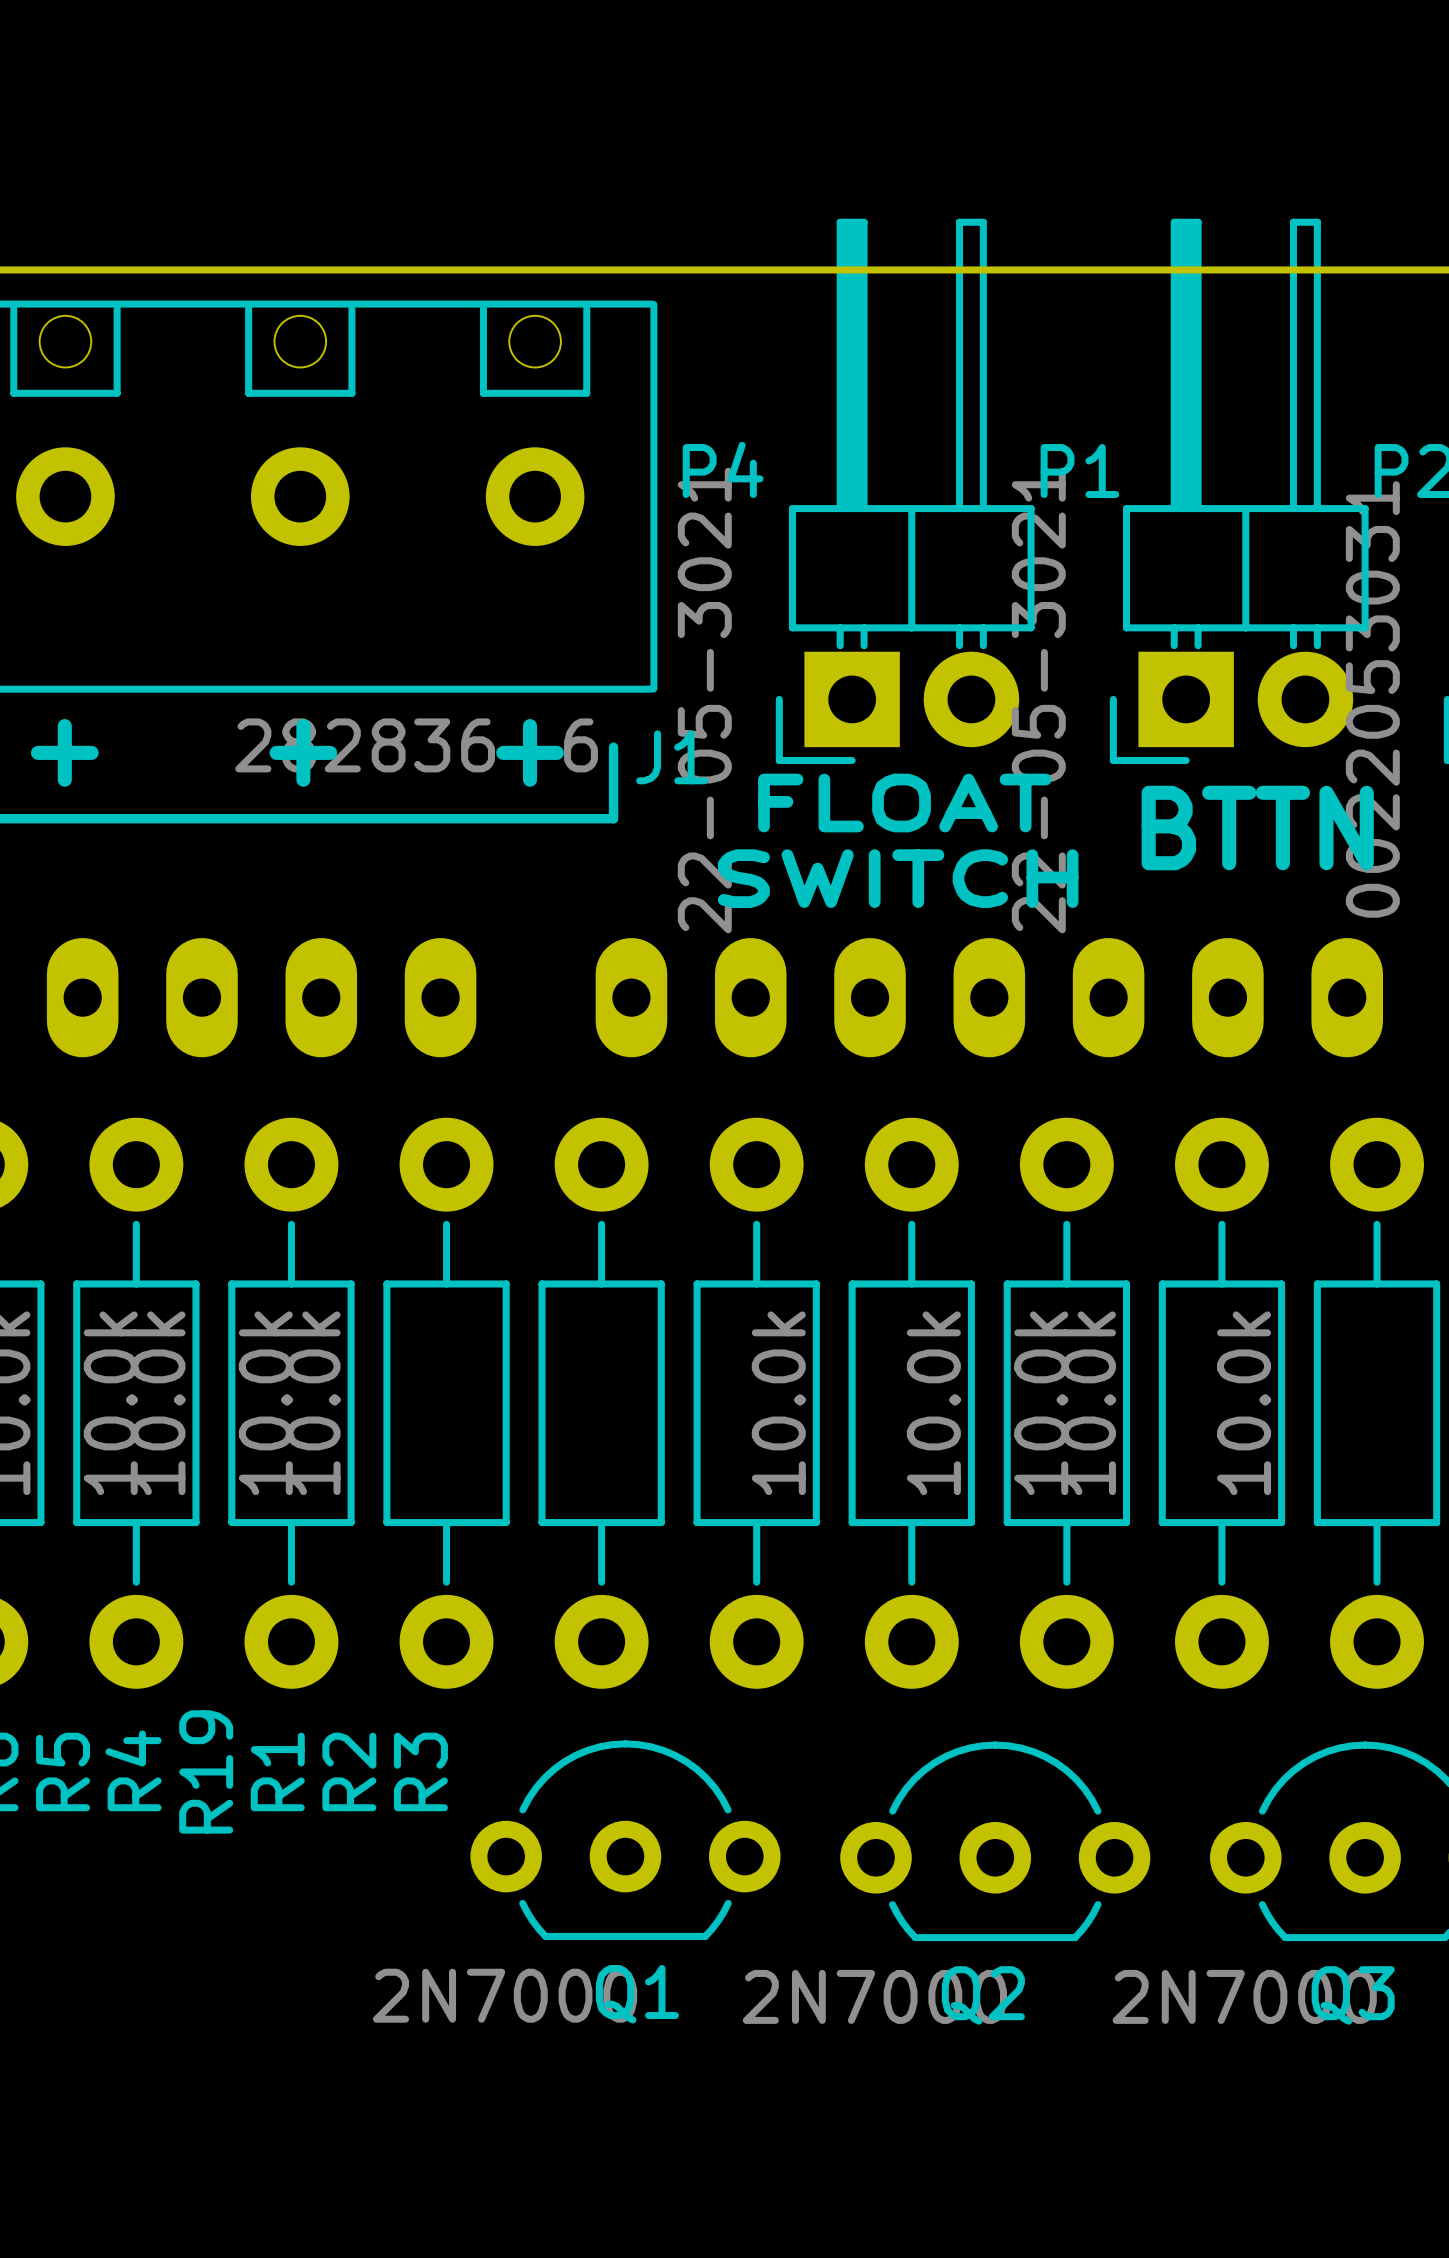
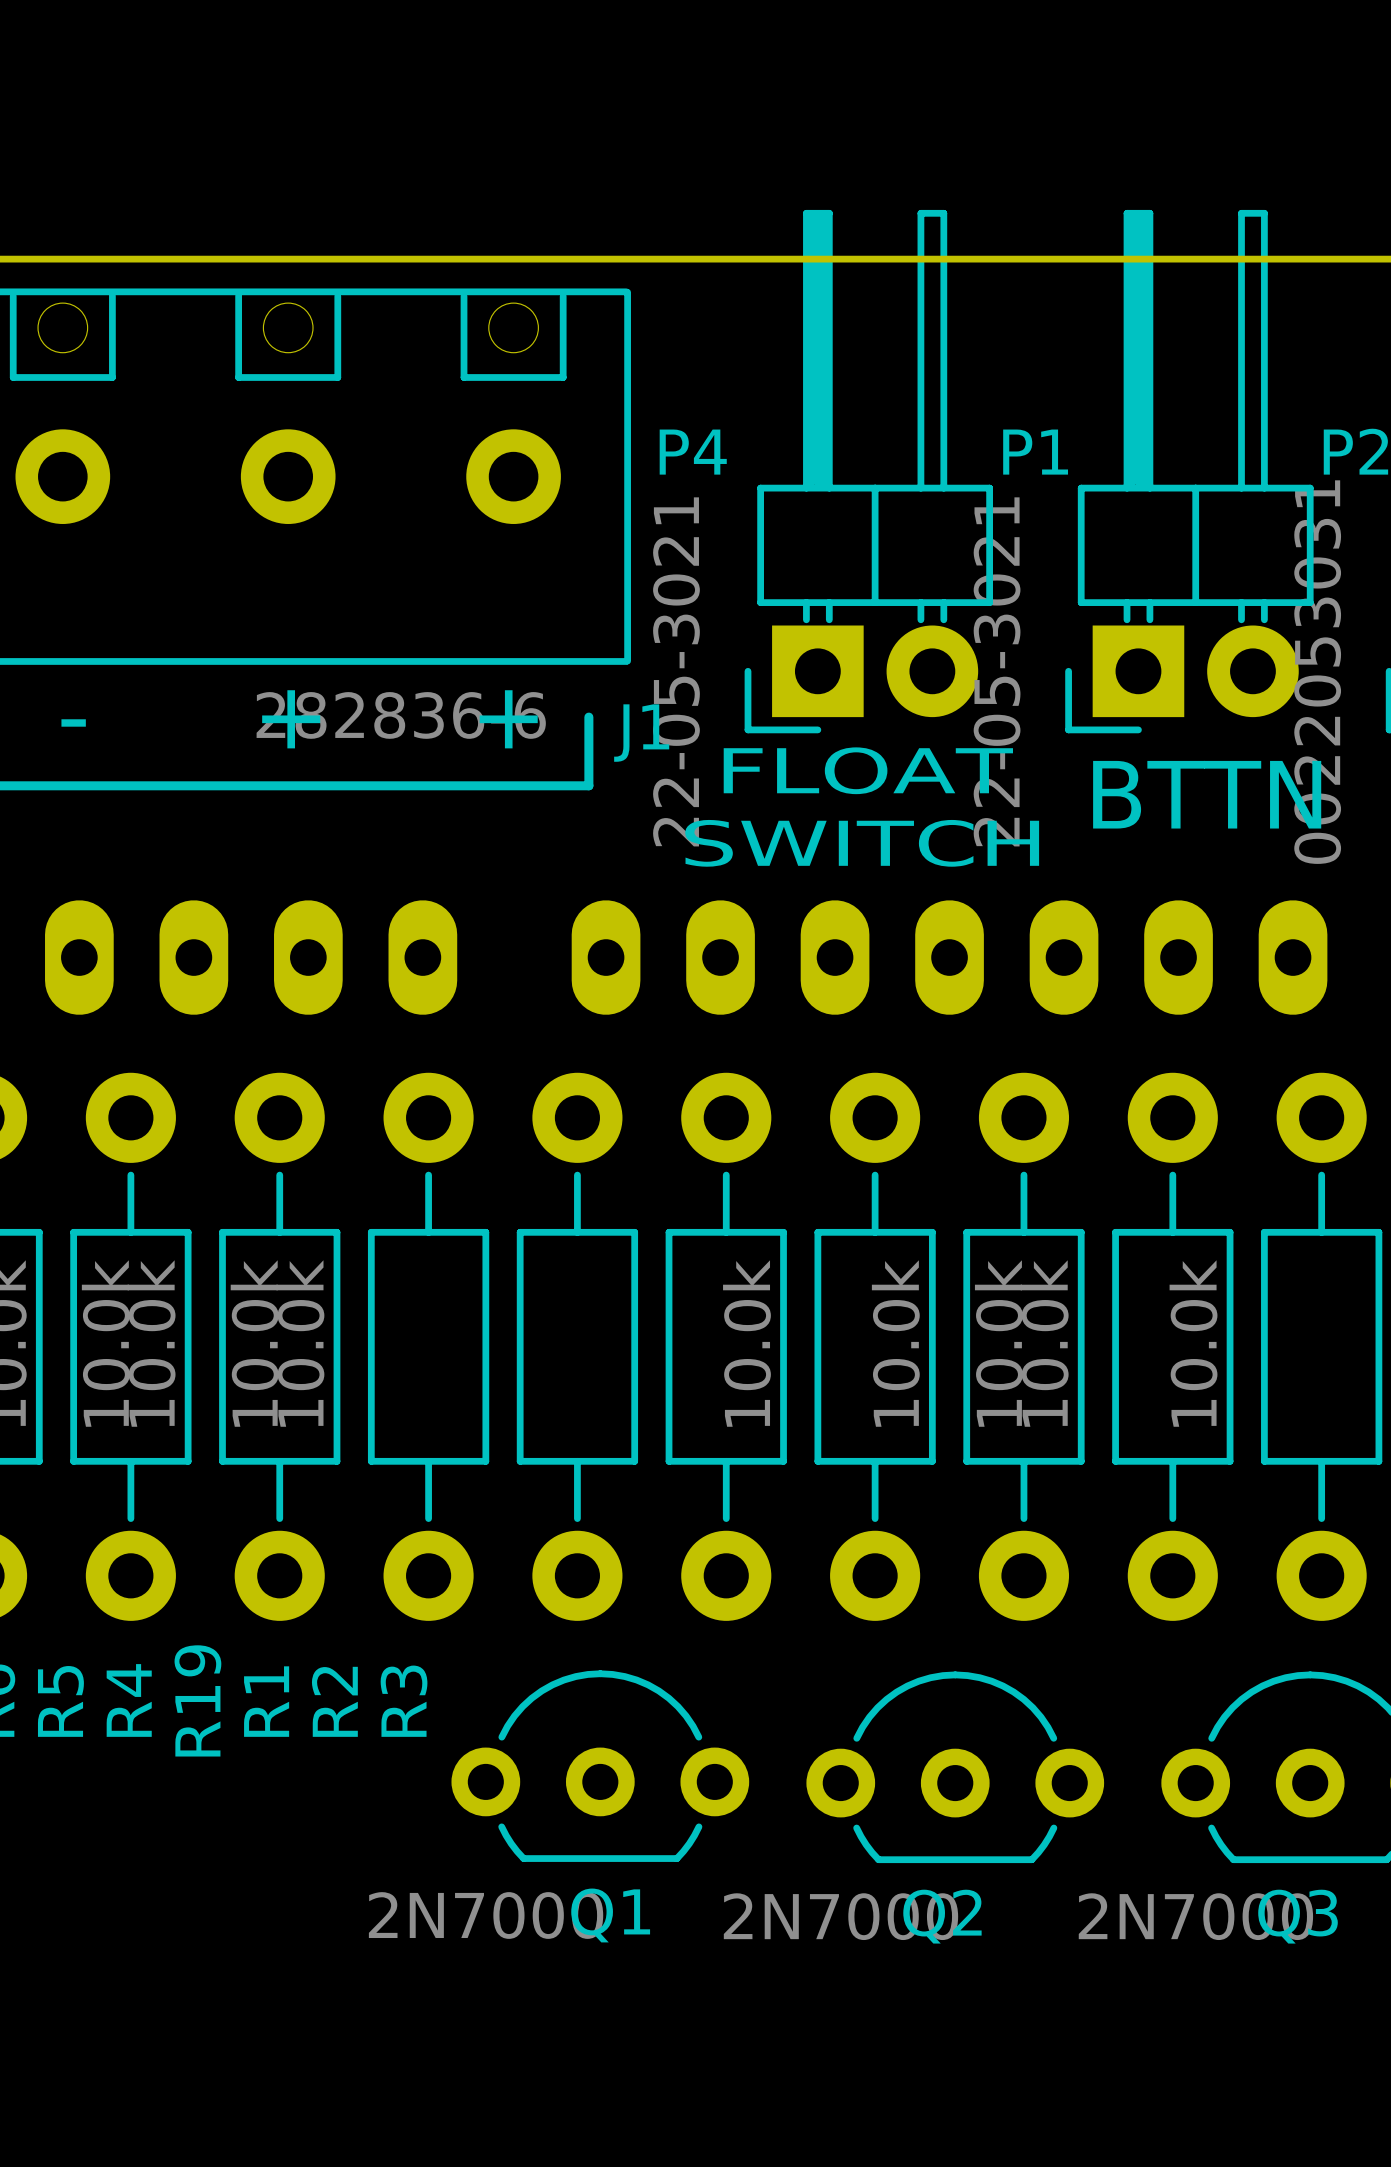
text: + (64, 752) -> - (73, 722)

